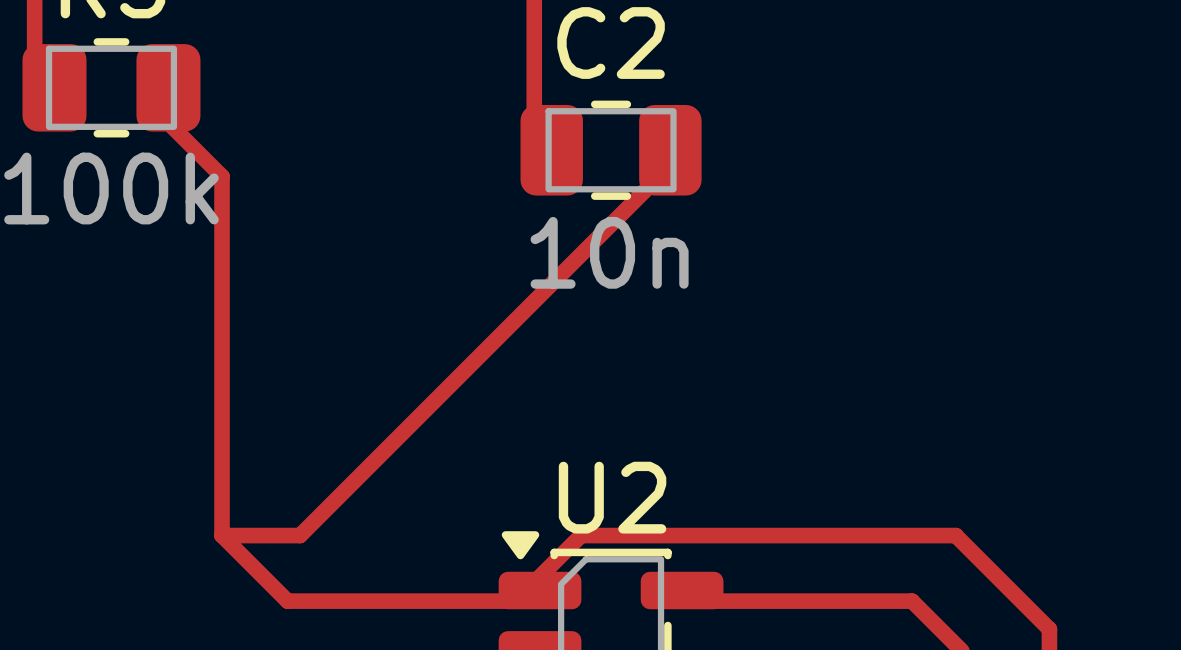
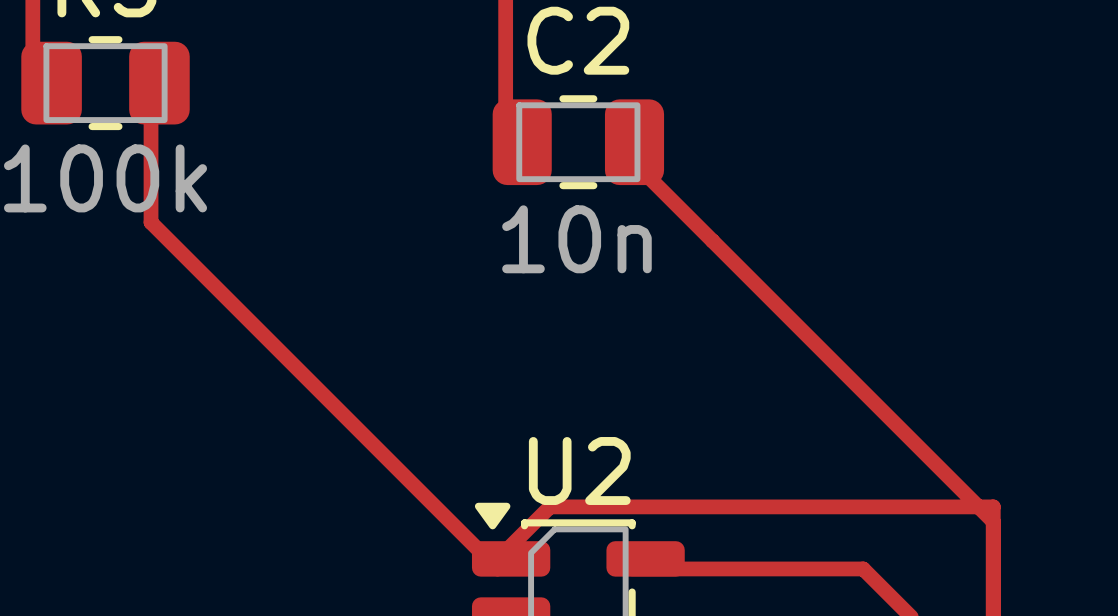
track: (159, 114) (222, 176) (222, 535) -> (151, 107) (151, 222) (497, 568)
track: (659, 164) (659, 176) (300, 535) (222, 535) -> (623, 155) (635, 167) (638, 167) (993, 521)
track: (222, 535) (287, 601) (525, 601) -> none
track: (955, 535) (1049, 629) -> (904, 506) (993, 506) (993, 595)

